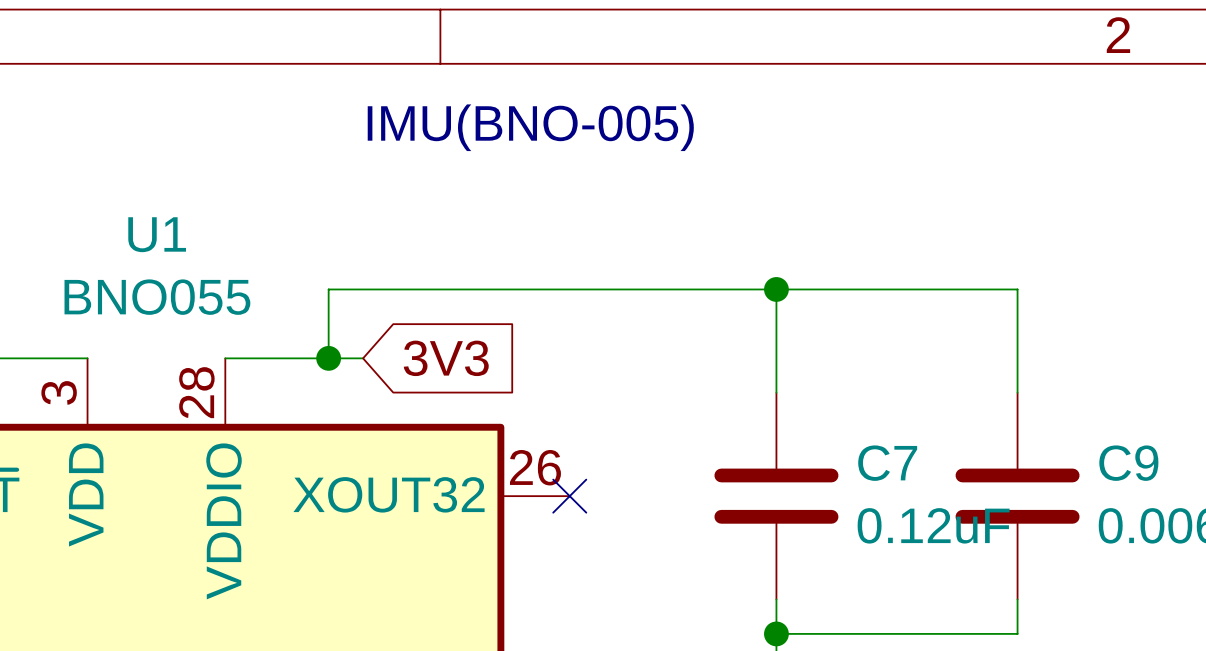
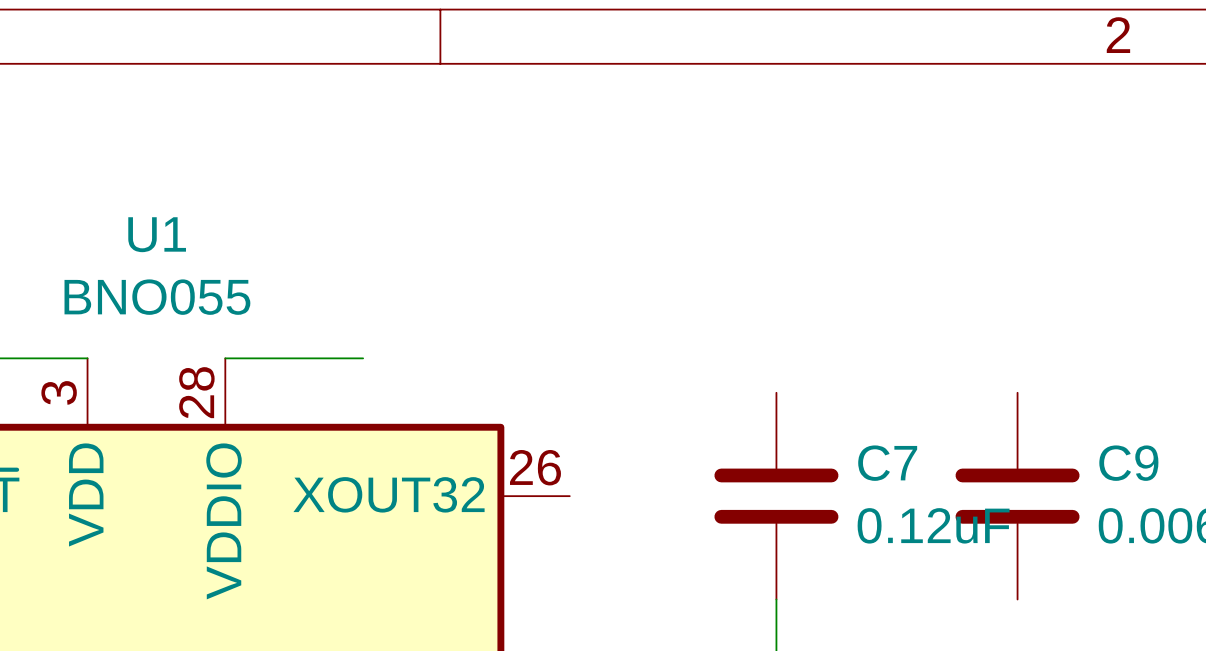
text: IMU(BNO-005) (530, 127) -> none
wire: (776, 289) (776, 392) -> none
junction: (776, 289) -> none
wire: (328, 358) (328, 289) (1017, 289) (1017, 392) -> none
junction: (328, 358) -> none
global label: 3V3 (446, 358) -> none
no-connect mark: (569, 496) -> none
wire: (1017, 599) (1017, 633) (776, 633) -> none
junction: (776, 633) -> none

